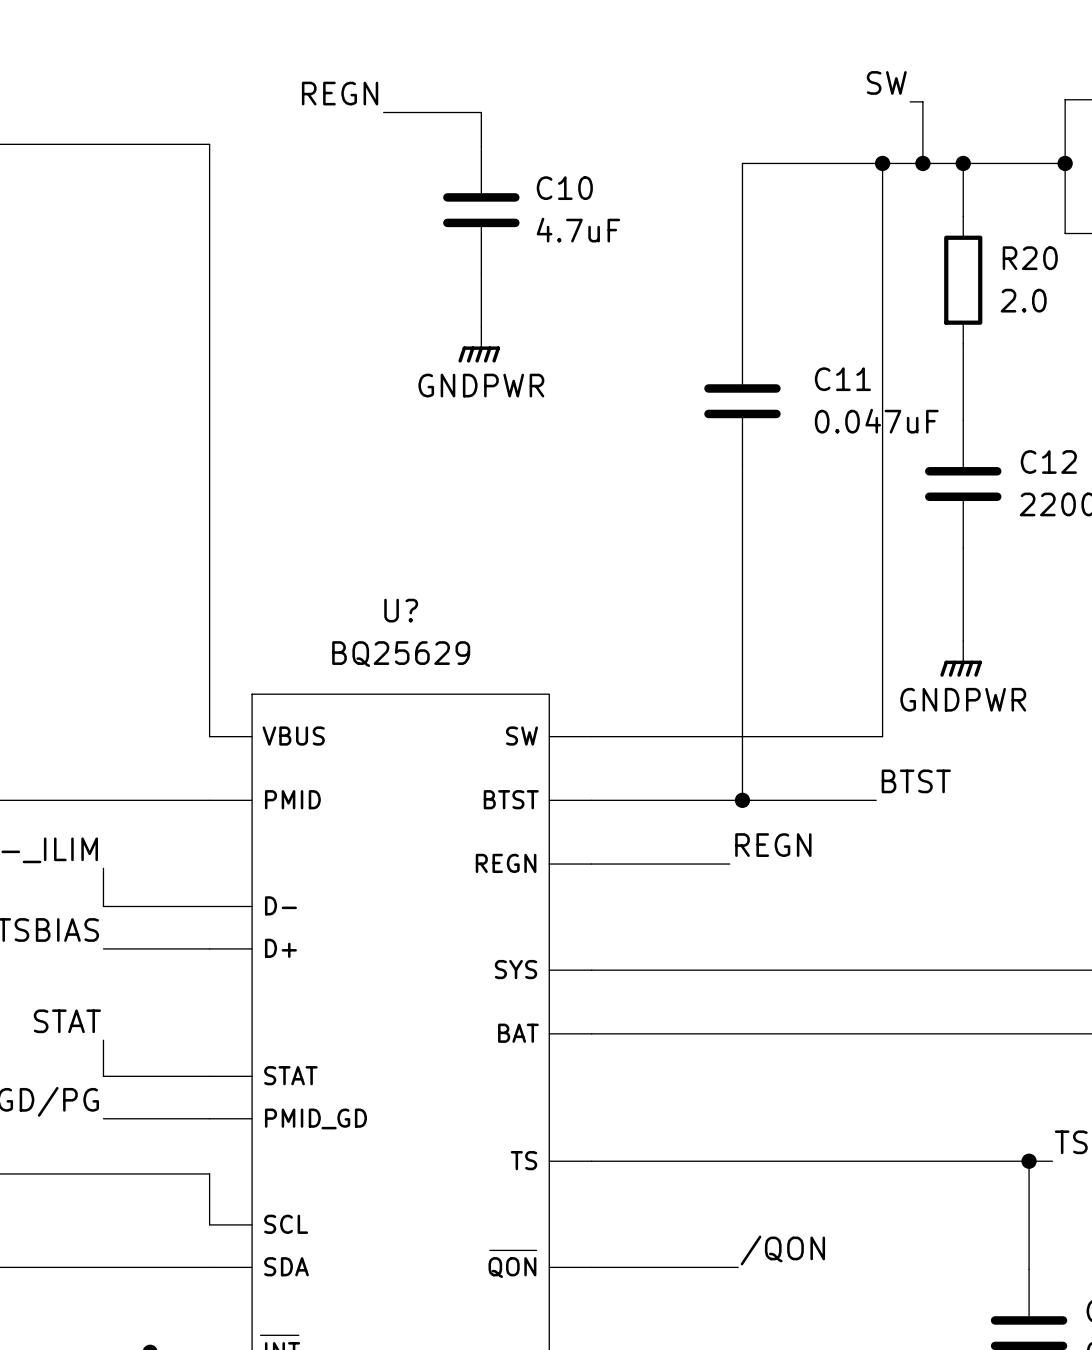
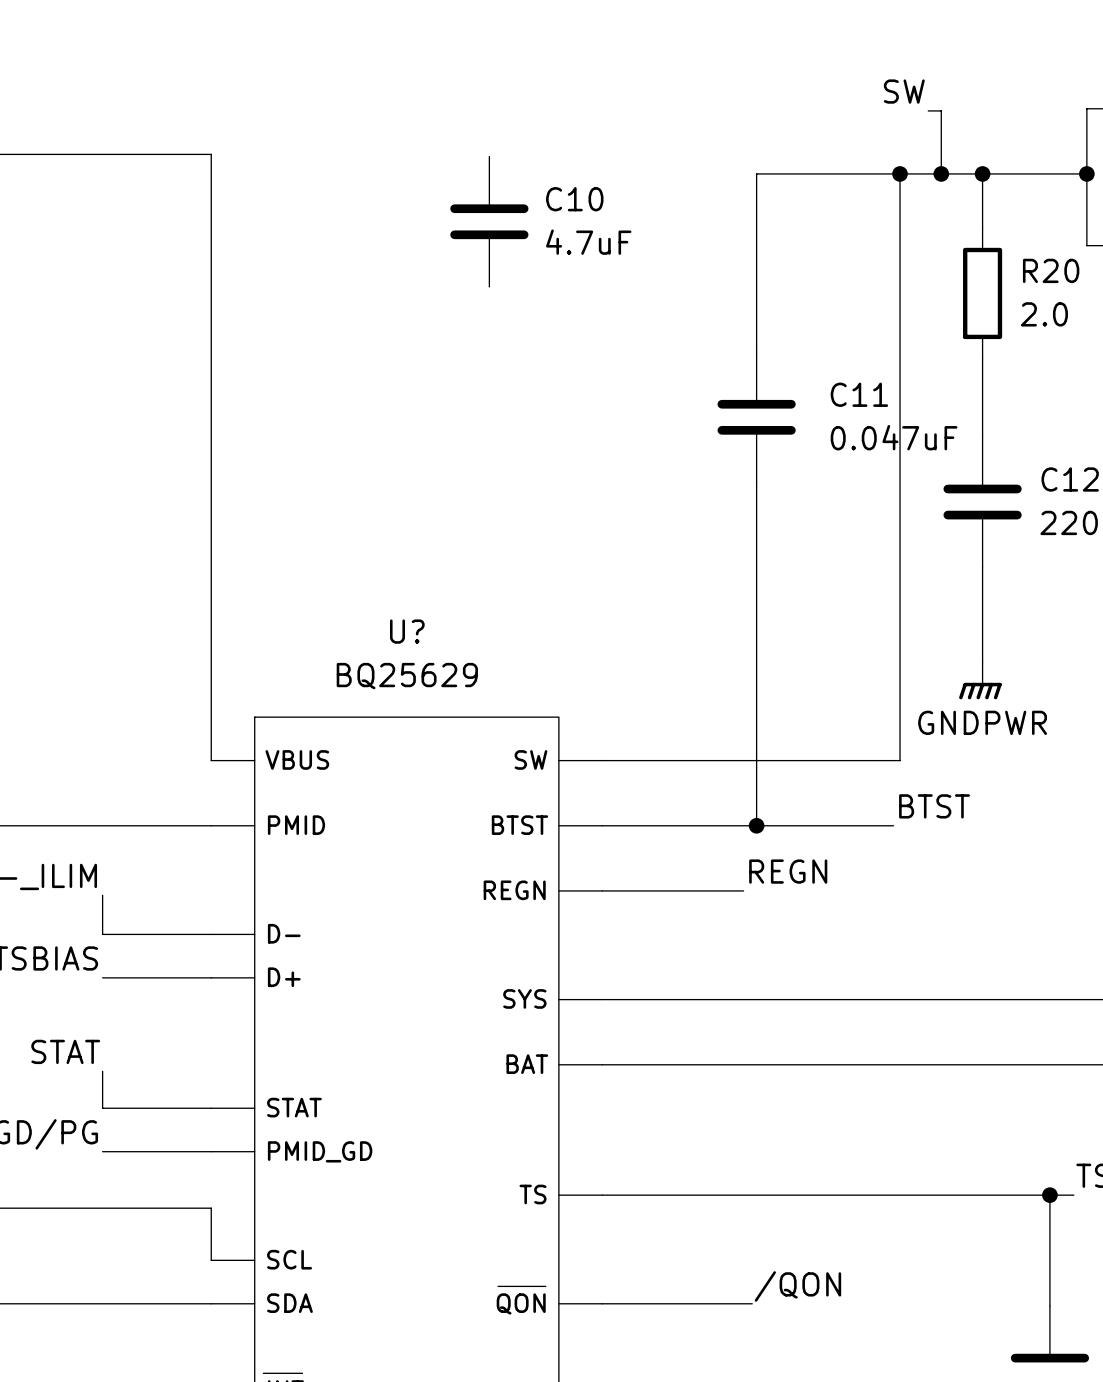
label: REGN (340, 93) -> none
wire: (383, 112) (481, 112) (481, 146) -> none
wire: (481, 273) (481, 326) -> none
power symbol: GNDPWR (479, 344) -> none

